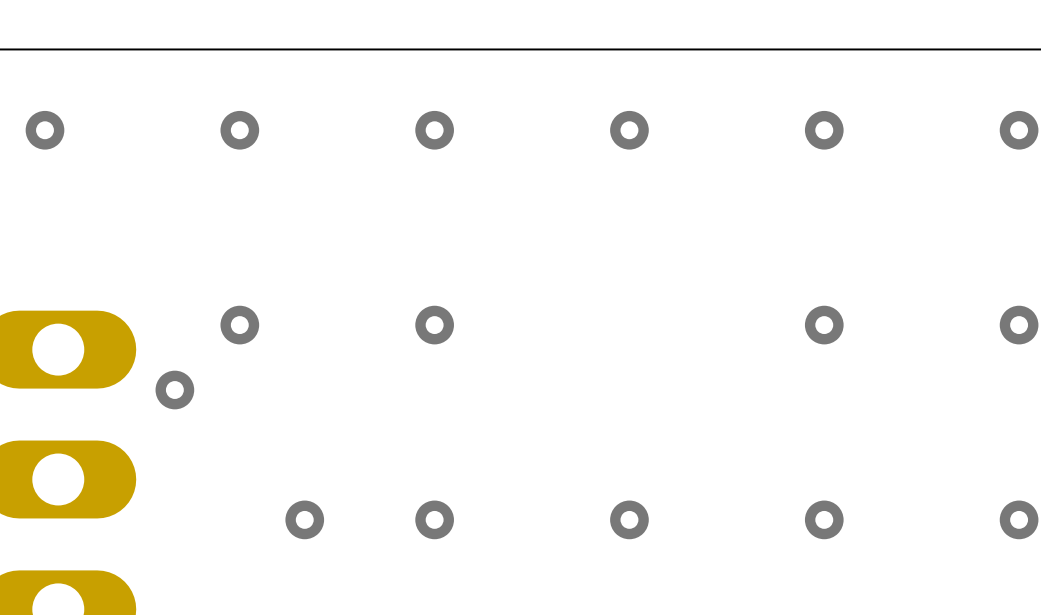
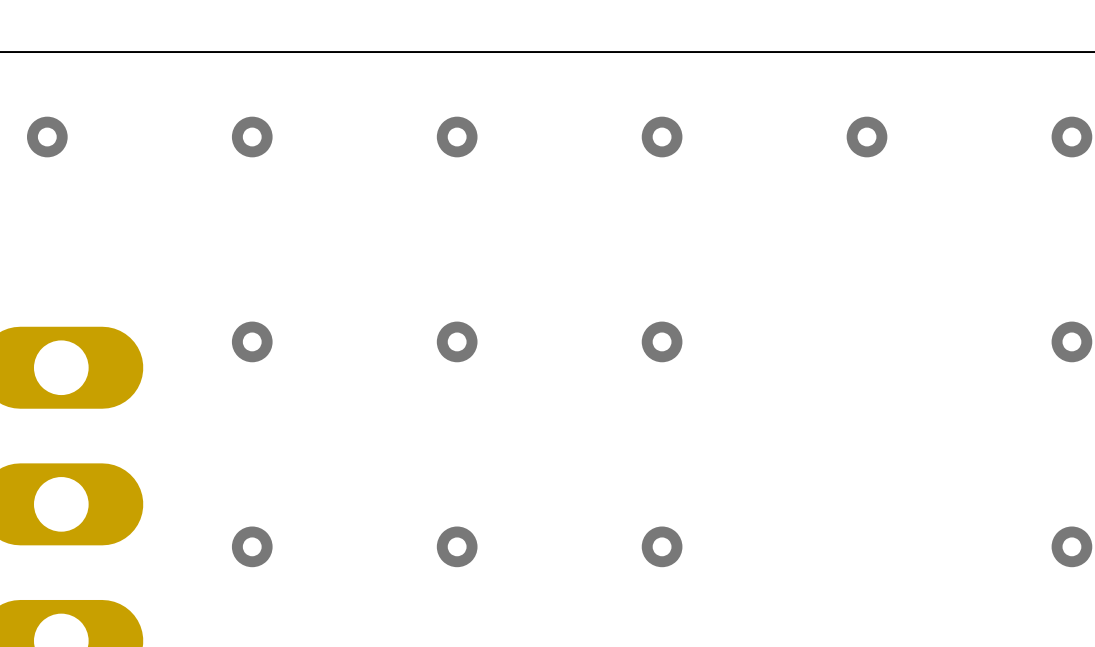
via: none -> (662, 341)
via: (824, 325) -> none
via: (174, 390) -> none
via position: (304, 519) -> (252, 546)
via: (824, 519) -> none

